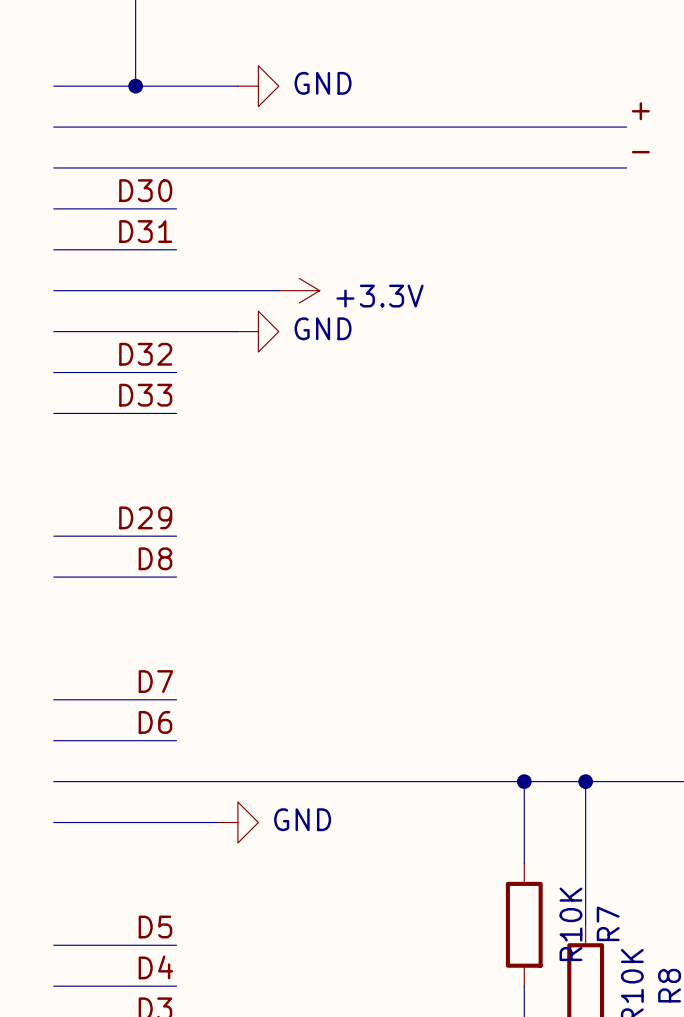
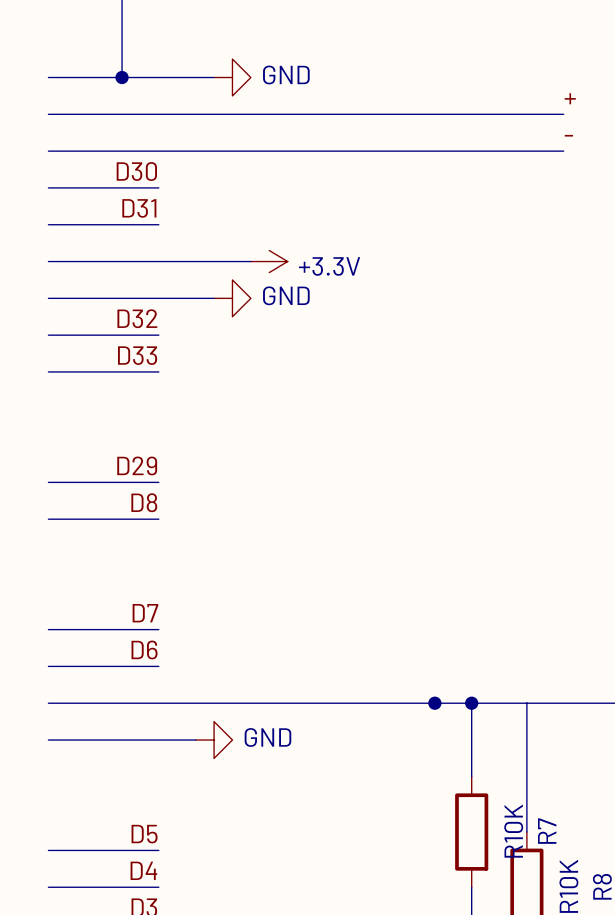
junction: none -> (434, 703)
junction: (585, 781) -> none

